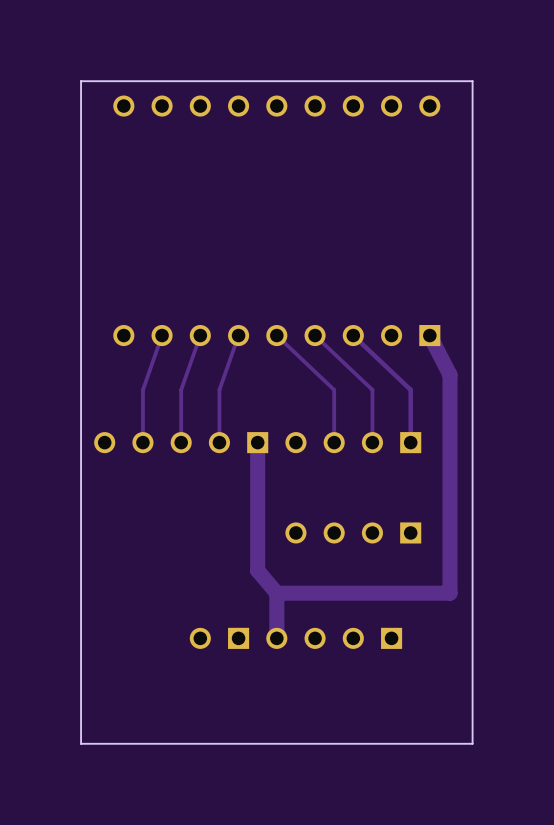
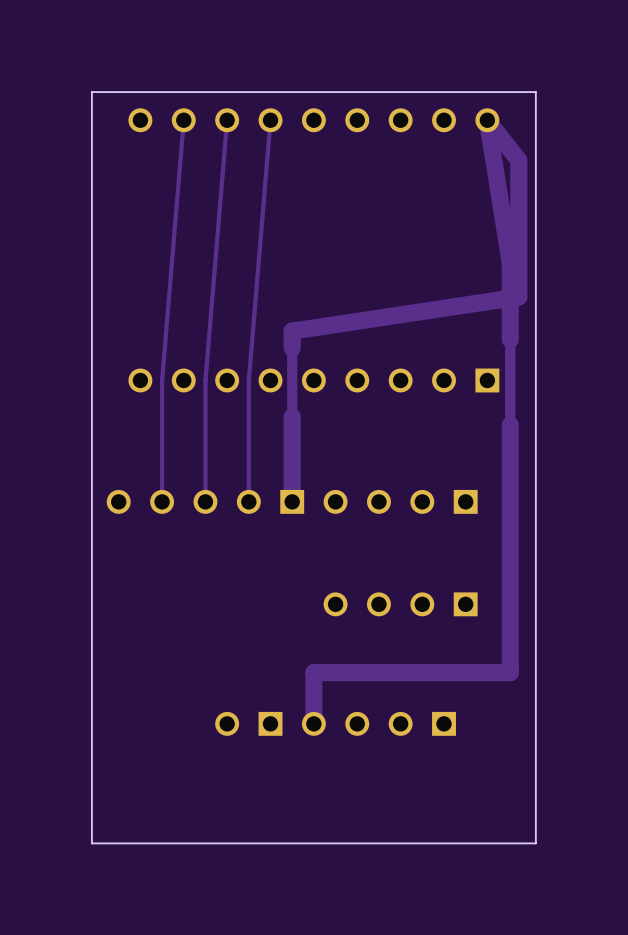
track: (162, 335) (142, 389) -> (183, 120) (162, 380) (162, 442)
track: (200, 335) (181, 389) -> (227, 120) (205, 380) (205, 442)
track: (238, 335) (219, 389) -> (270, 120) (248, 380) (248, 442)
track: (276, 335) (334, 389) (334, 442) -> none
track: (315, 335) (372, 389) (372, 442) -> none
track: (353, 335) (410, 389) (410, 442) -> none
track: (429, 335) (450, 374) -> (292, 501) (292, 331) (518, 296) (518, 160) (487, 120) (510, 262) (510, 339) (510, 425)
track: (257, 442) (257, 570) (276, 593) -> none

